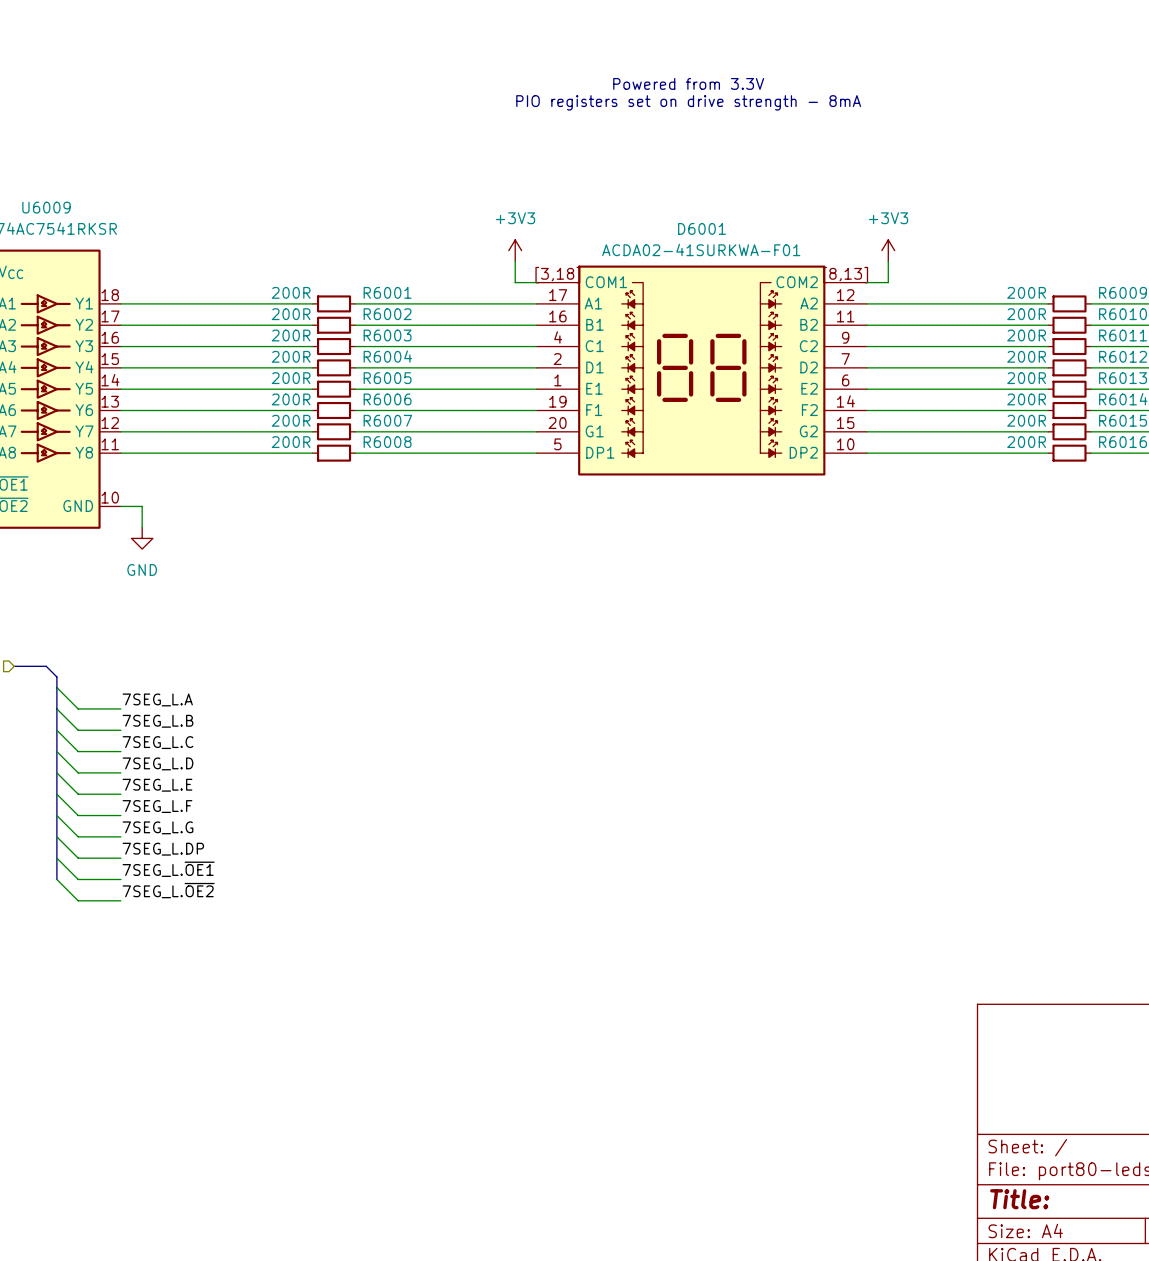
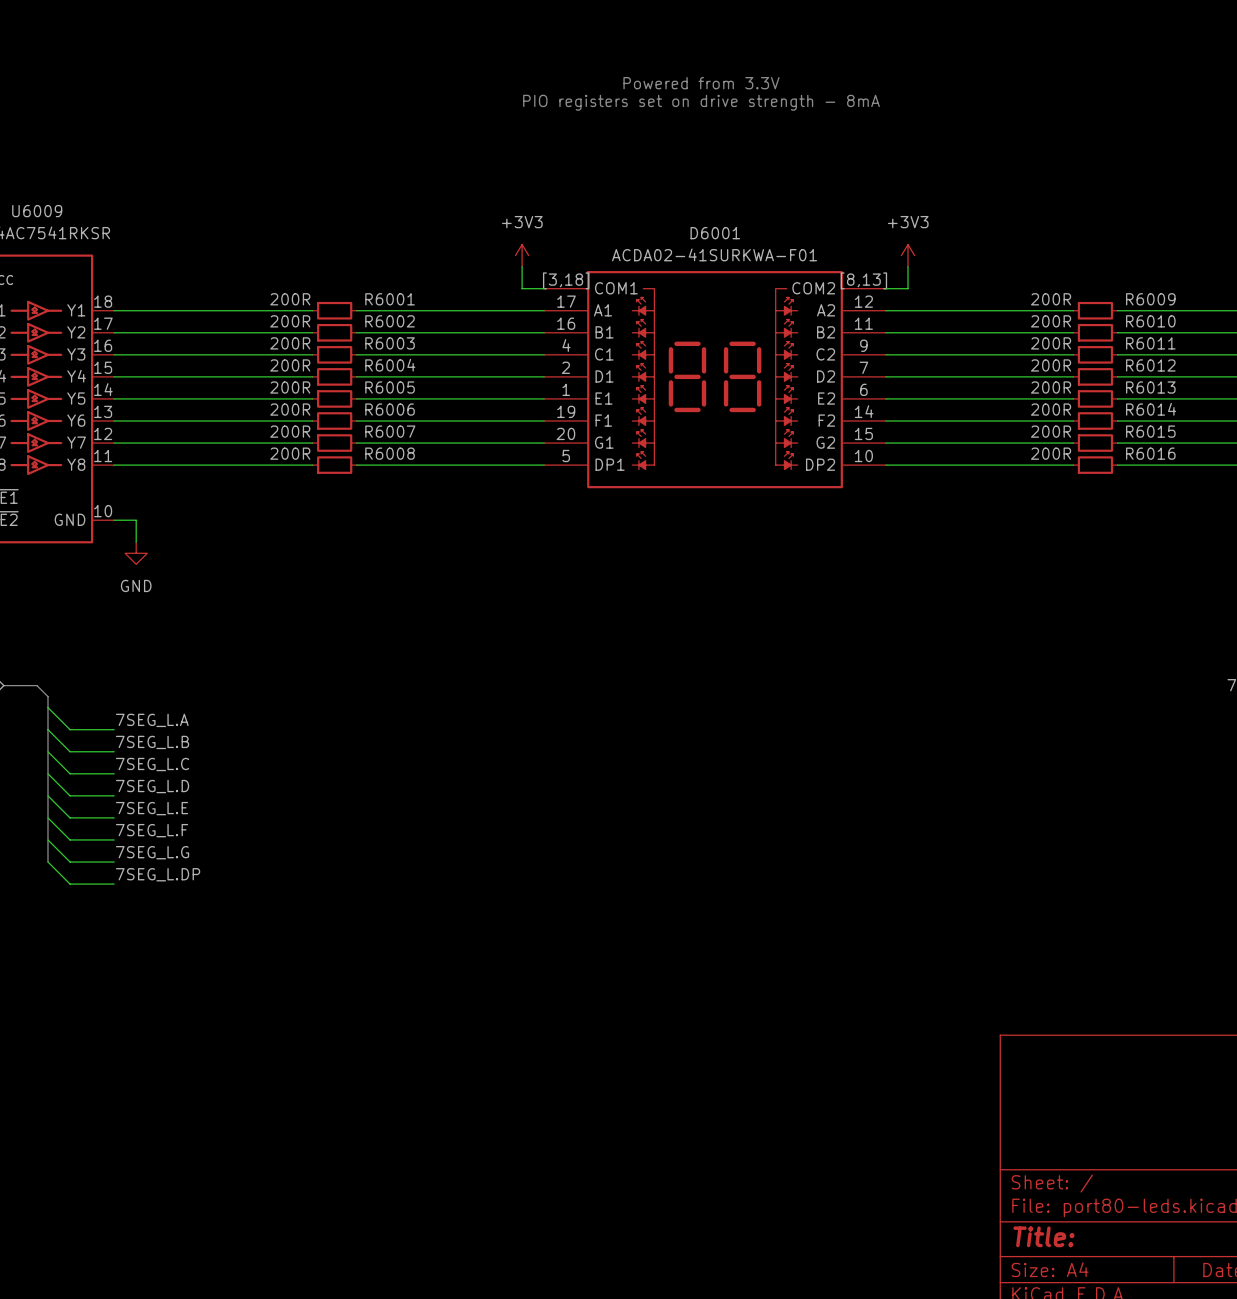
bus: (56, 836) (56, 879) -> none
wire: (56, 858) (78, 879) (120, 879) -> none
label: 7SEG_L.~{OE1} (168, 869) -> none
wire: (56, 879) (78, 900) (120, 900) -> none
label: 7SEG_L.~{OE2} (168, 890) -> none

